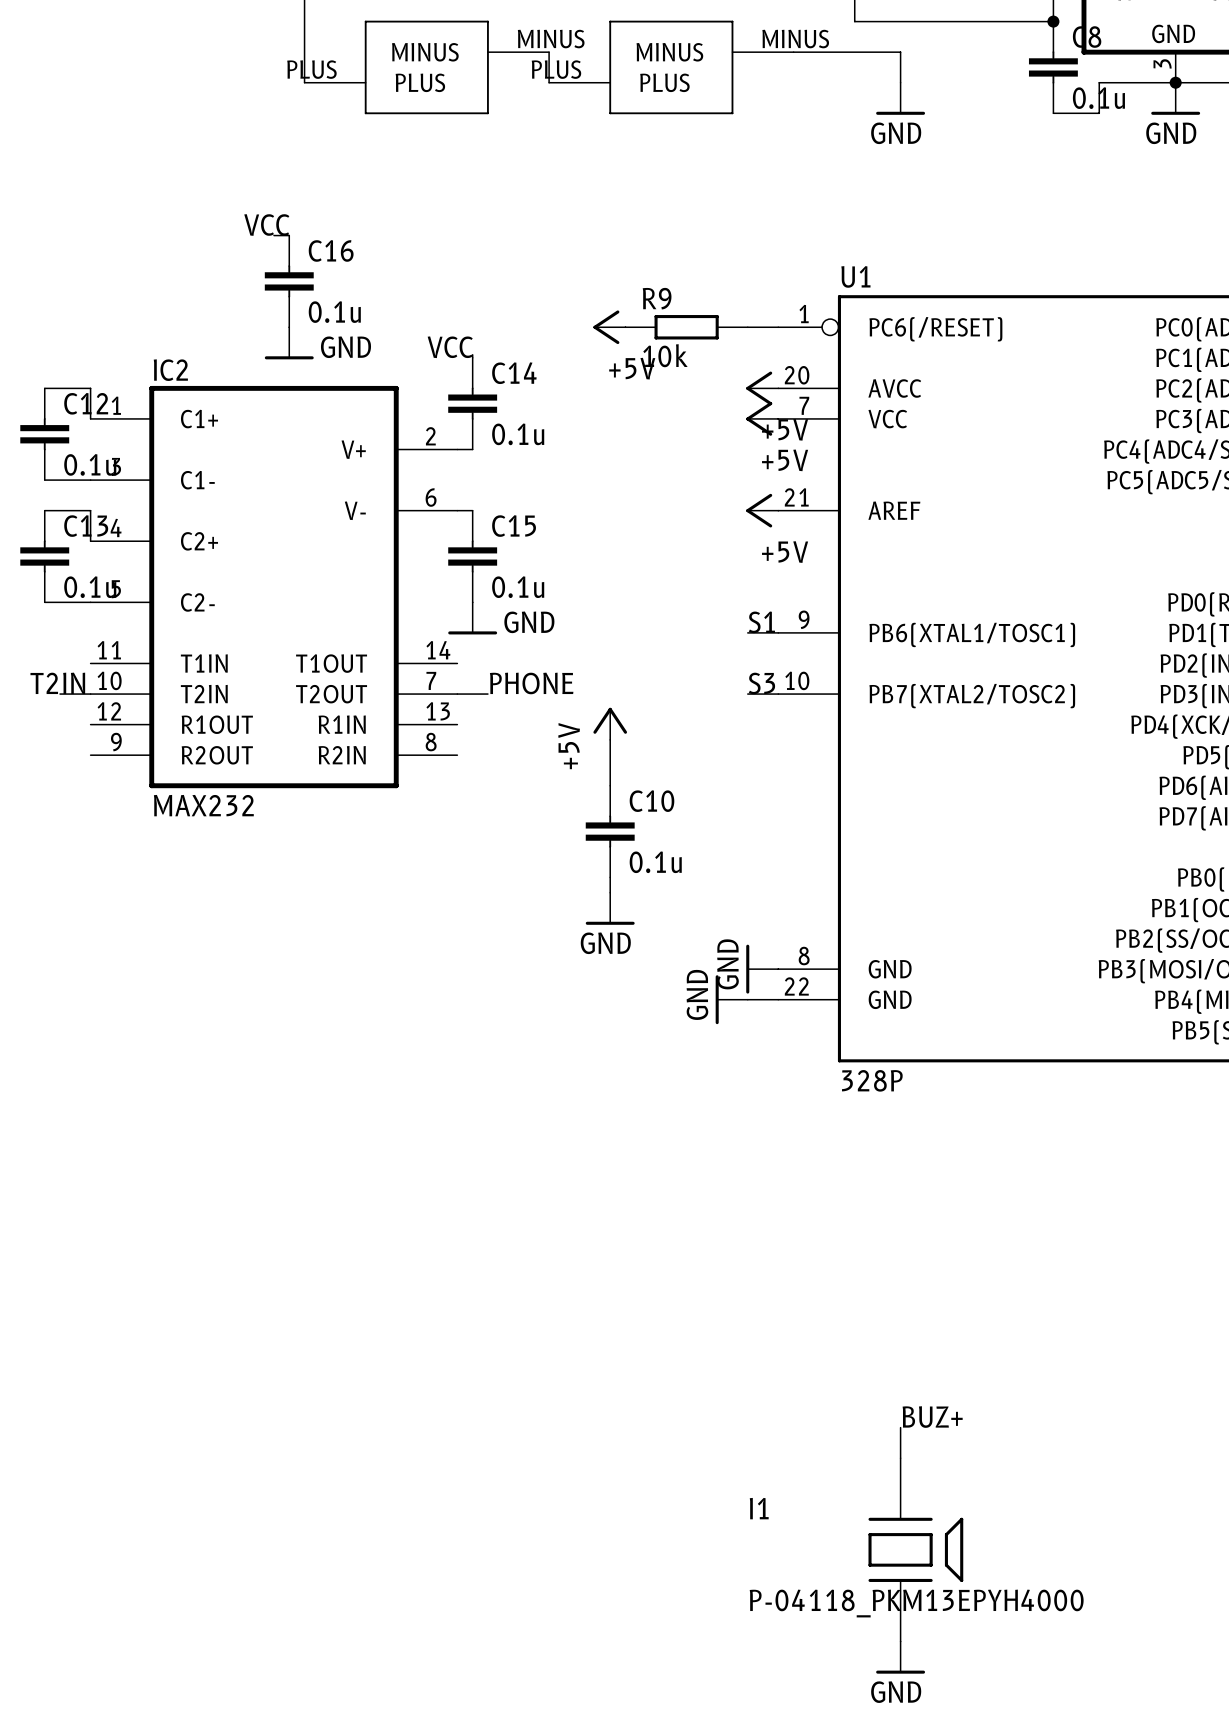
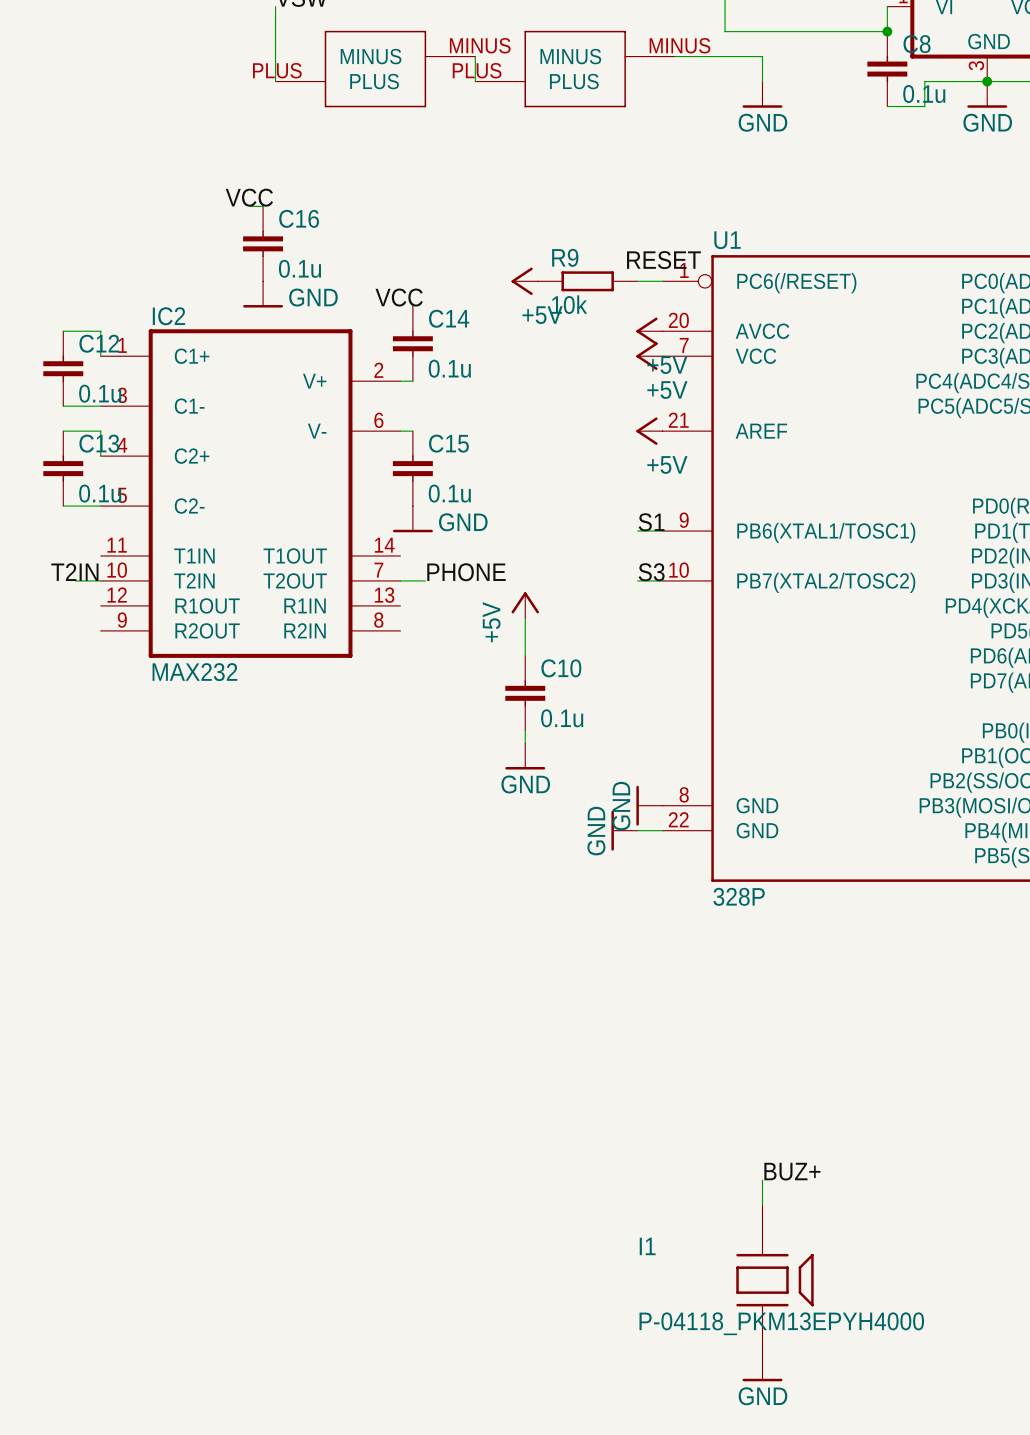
label: none -> RESET (663, 260)

